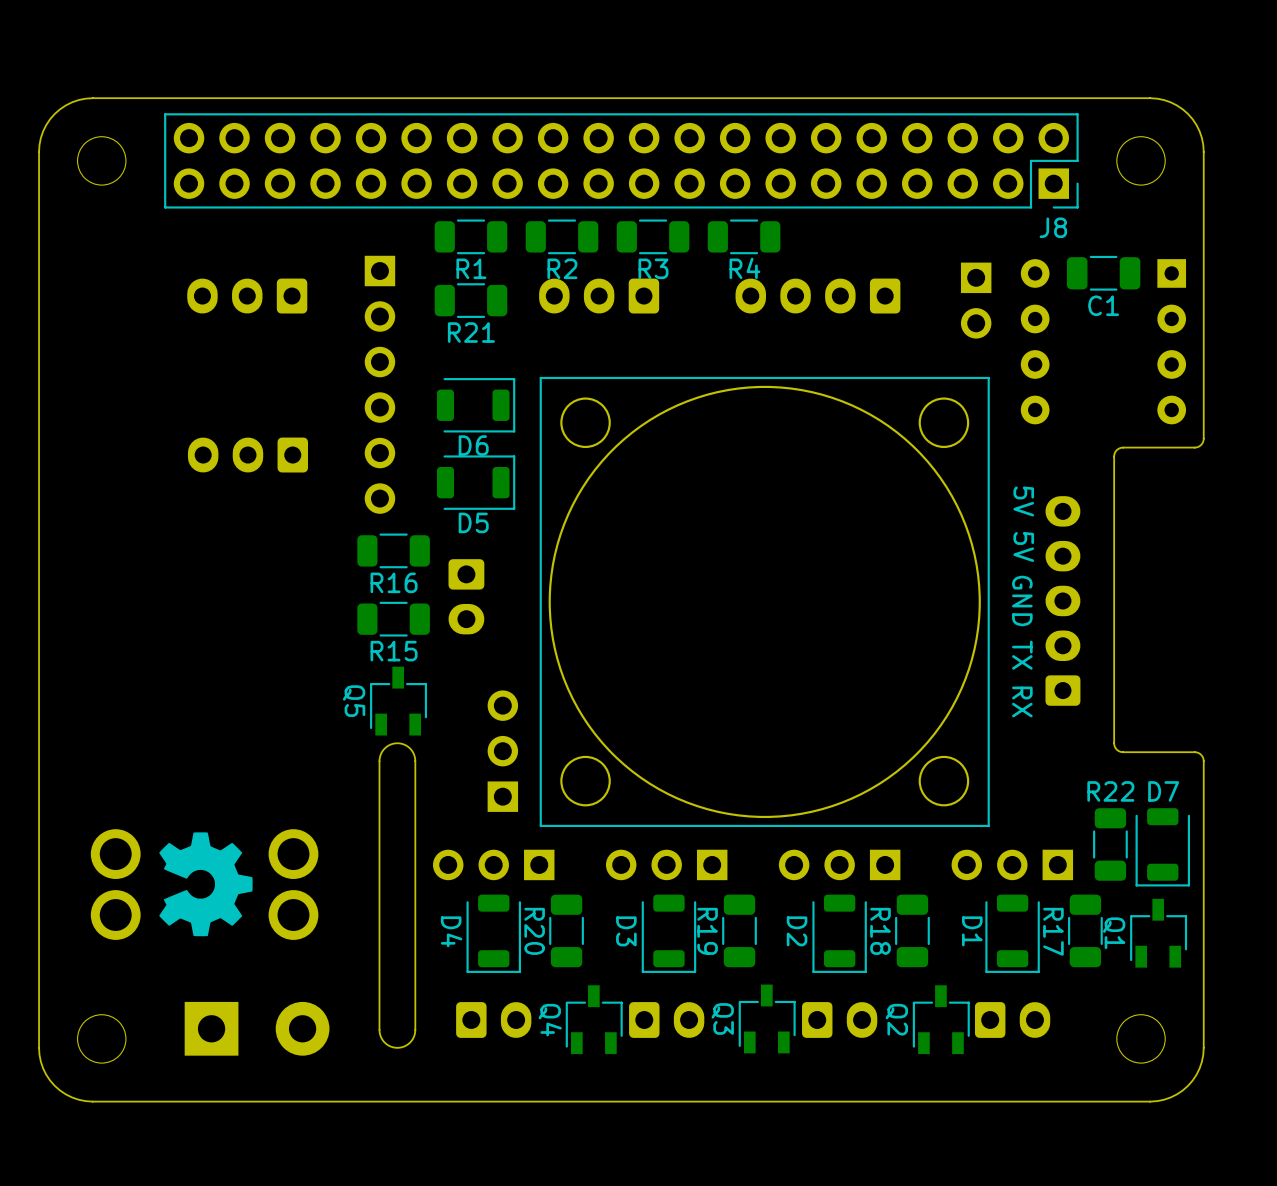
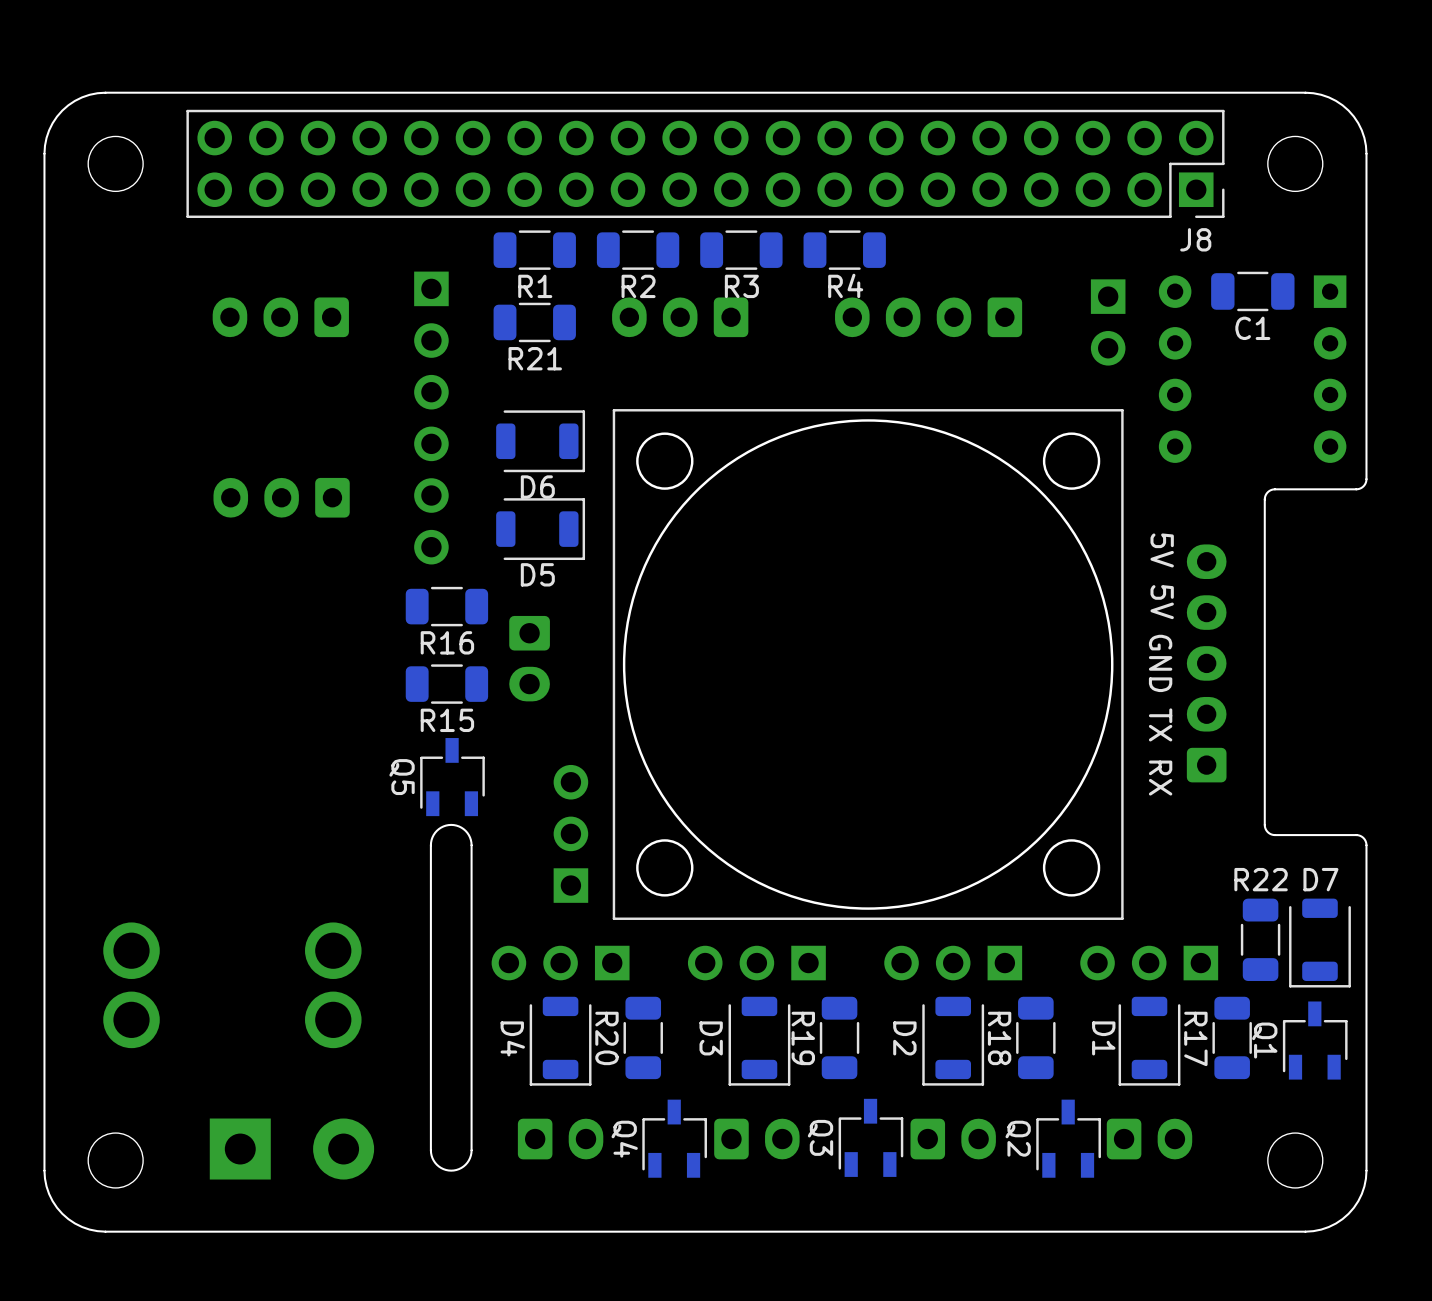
drawing: [159, 832, 253, 937] -> none

